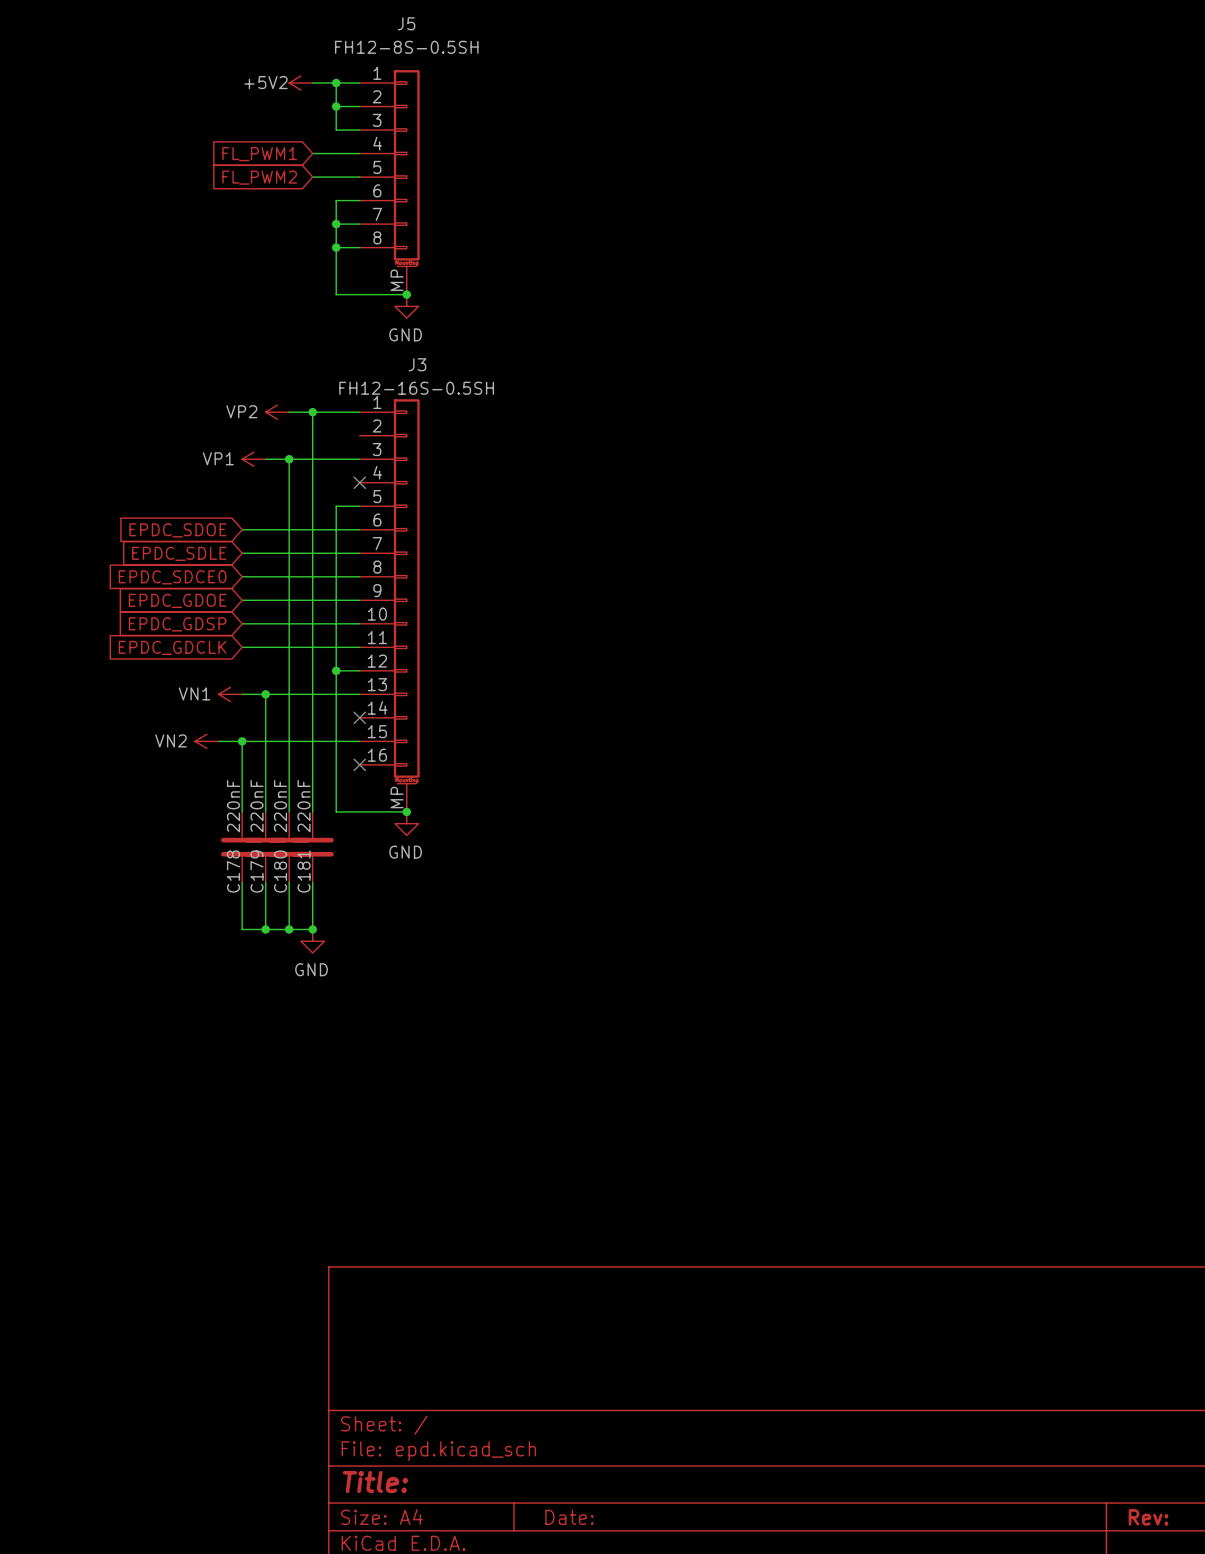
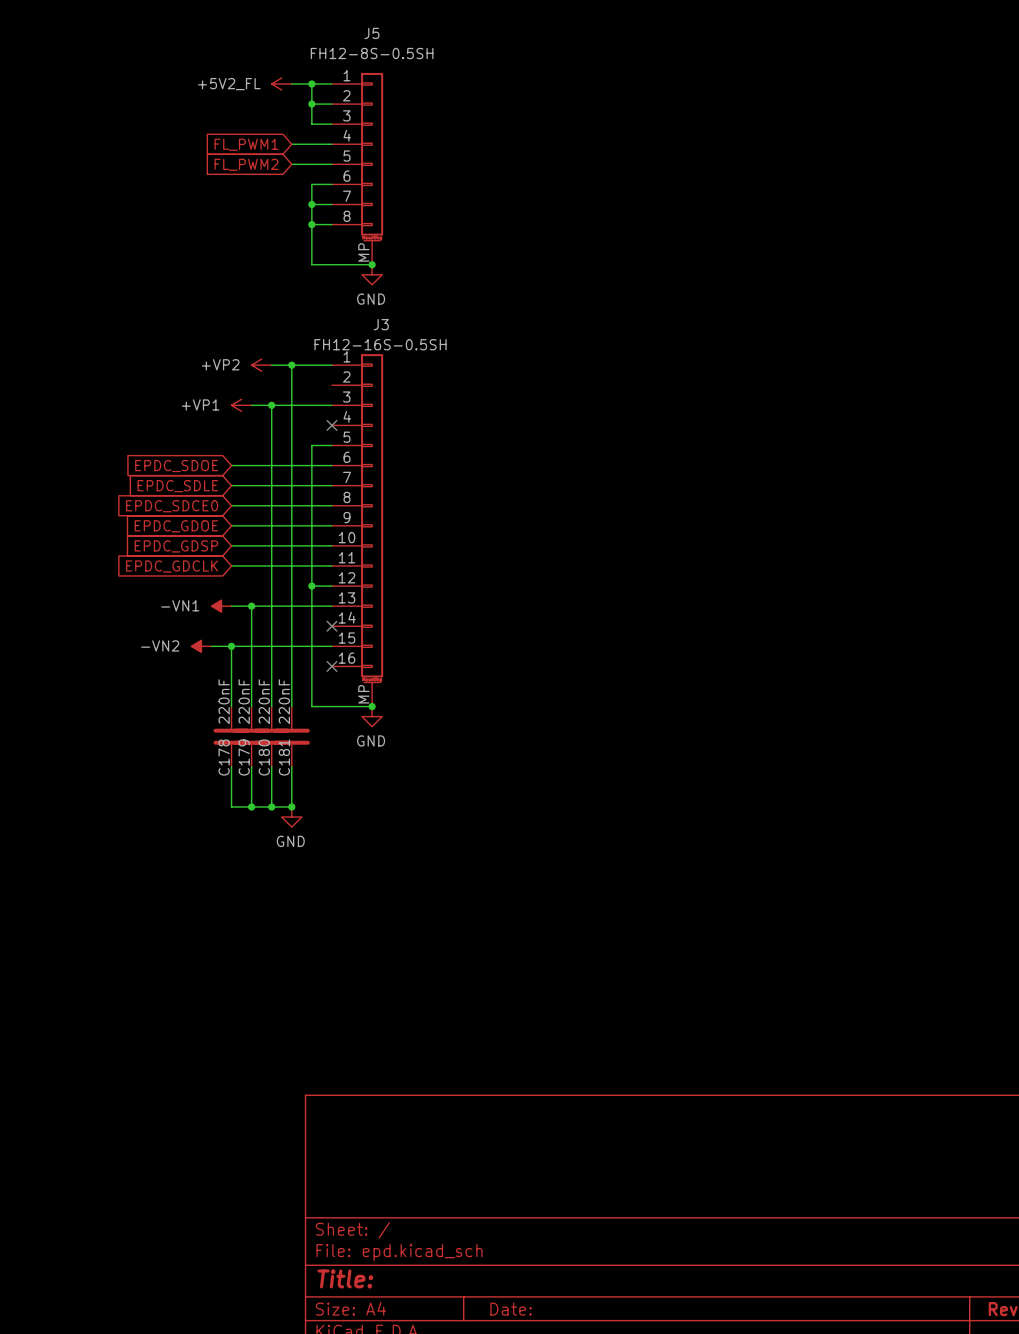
power symbol: +5V2 (300, 83) -> +5V2_FL (281, 84)
power symbol: VP2 (277, 412) -> +VP2 (261, 365)
power symbol: VP1 (253, 459) -> +VP1 (241, 405)
power symbol: VN1 (230, 694) -> -VN1 (221, 606)
power symbol: VN2 (206, 741) -> -VN2 (201, 646)

